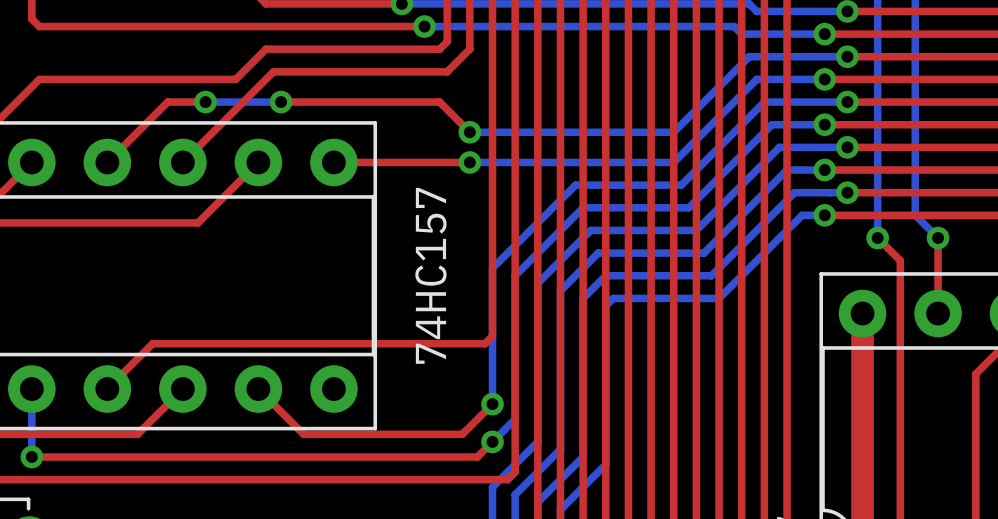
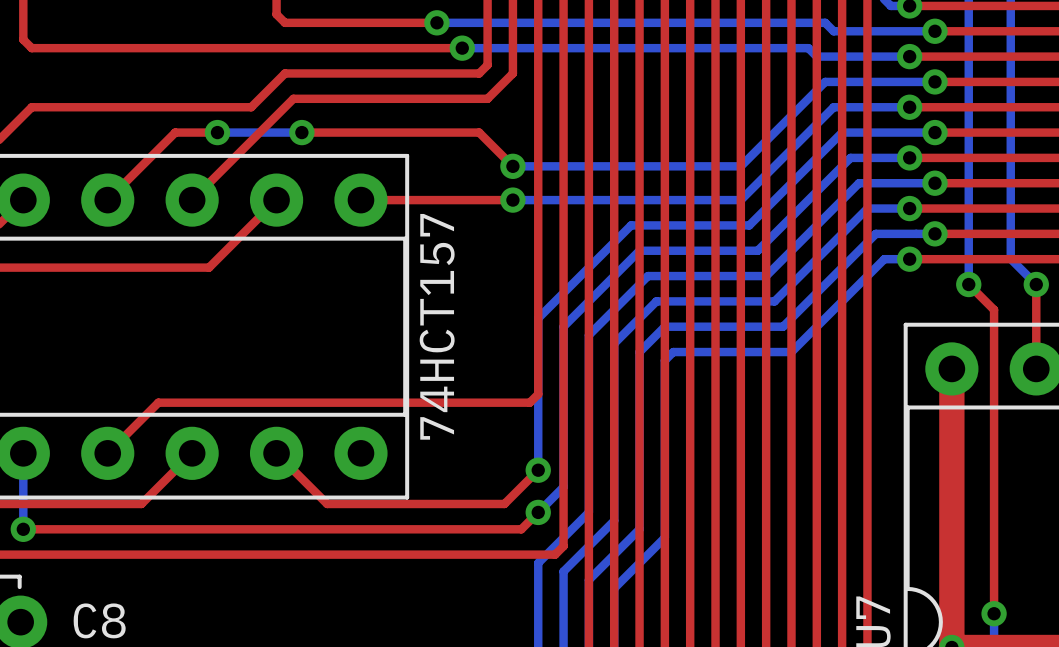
part value: 74HC157 (430, 275) -> 74HCT157 (437, 326)

